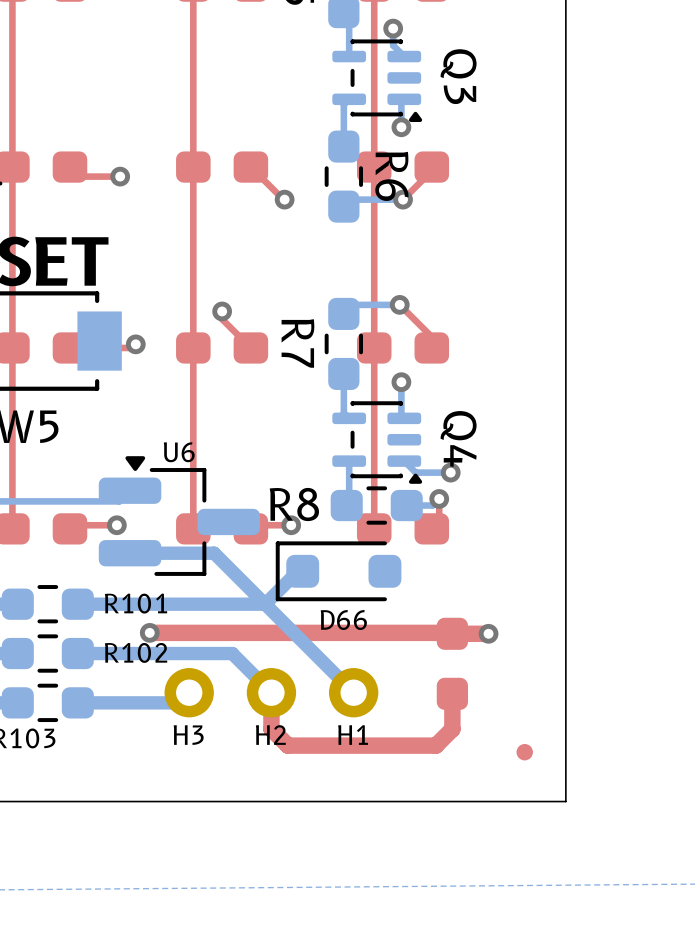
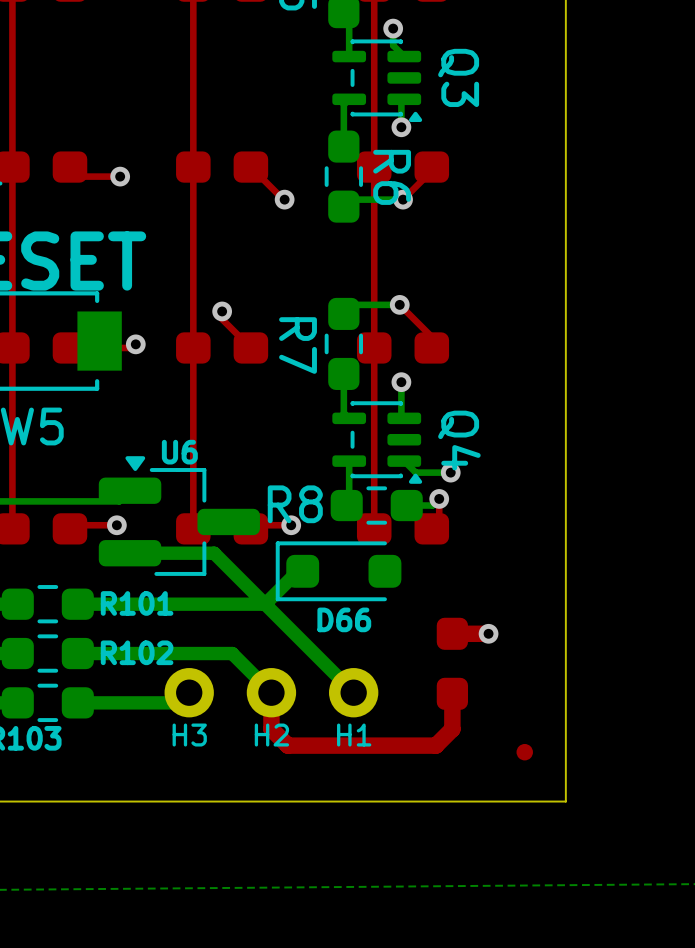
top track: (149, 632) (452, 633) -> none
via: (149, 632) -> none

